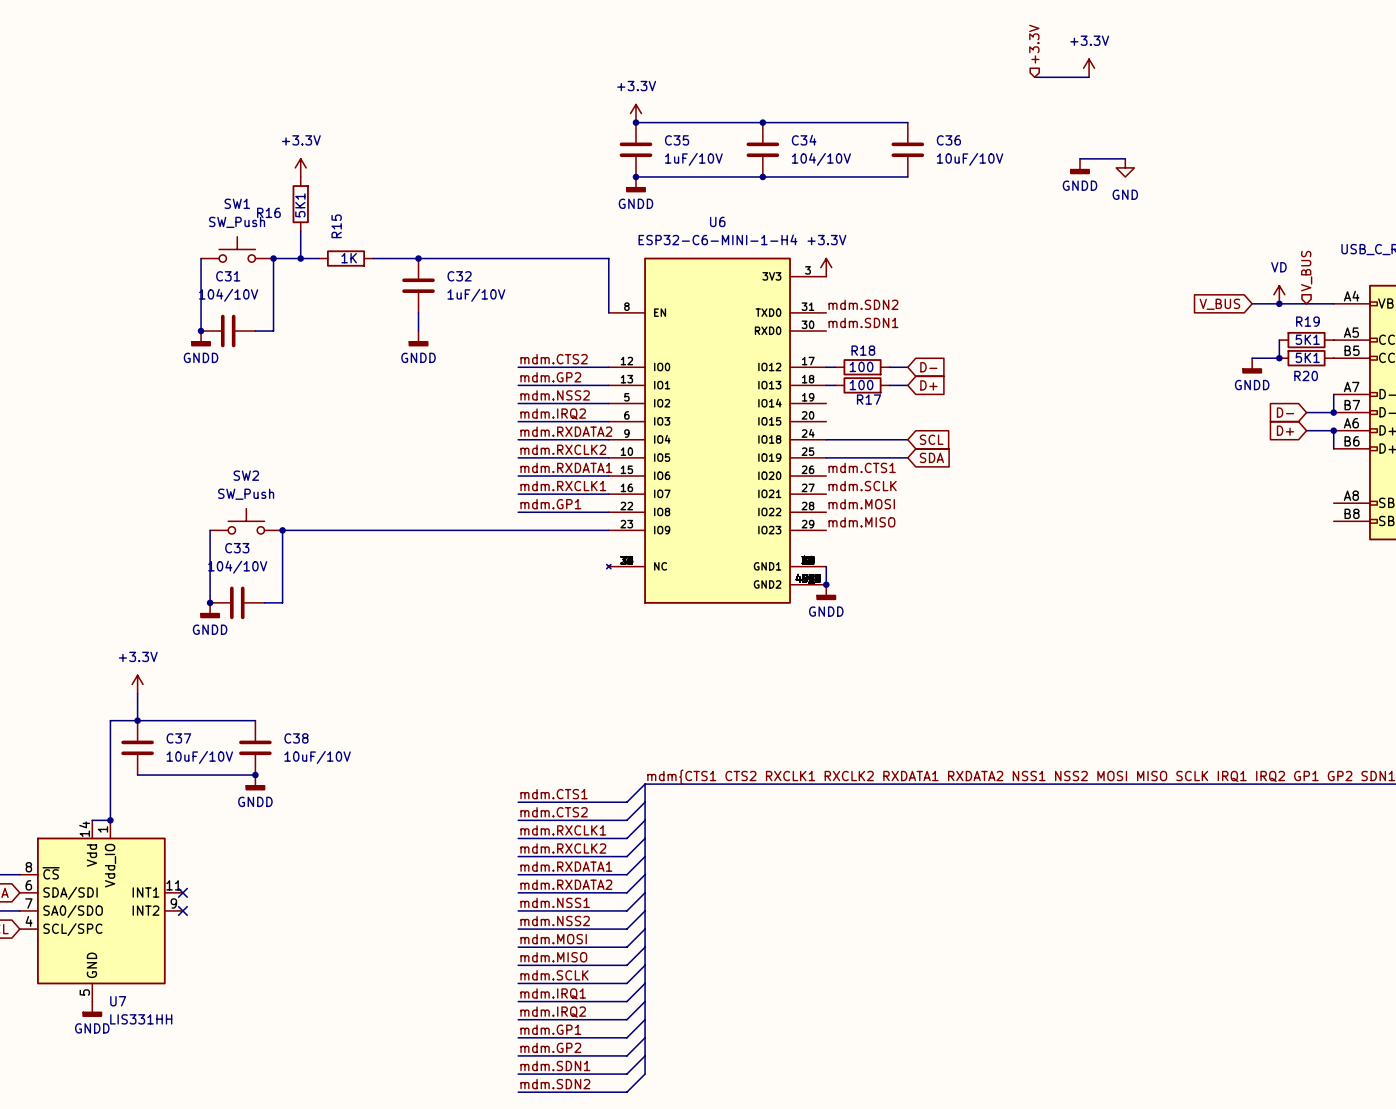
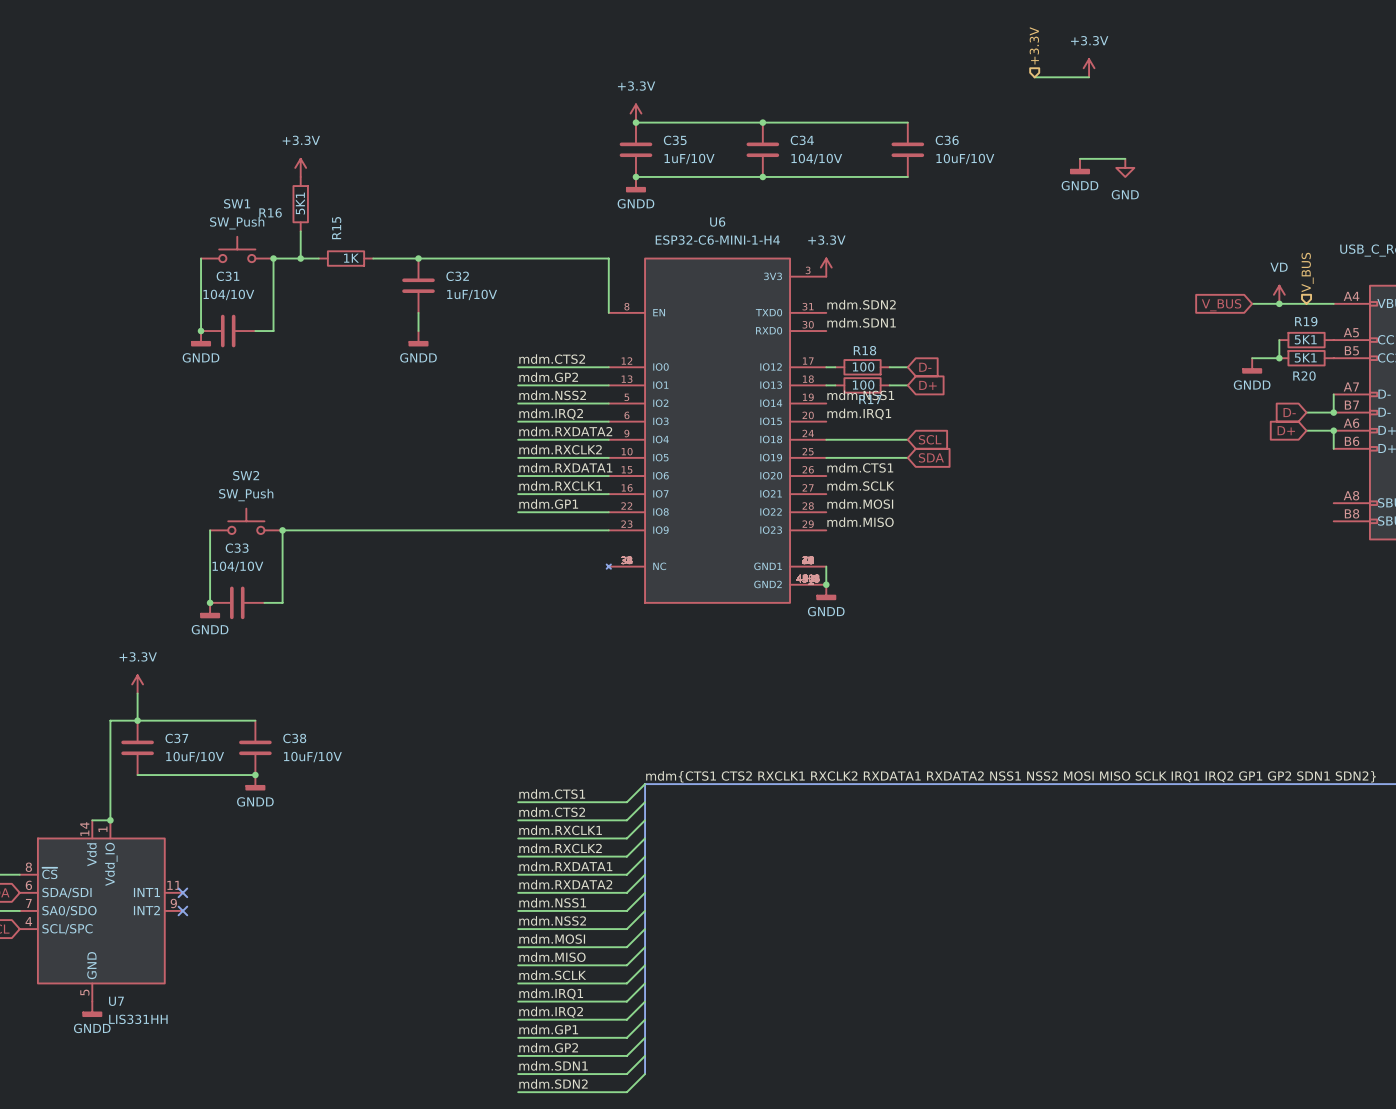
label: none -> mdm.NSS1 (860, 395)
label: none -> mdm.IRQ1 (859, 414)

